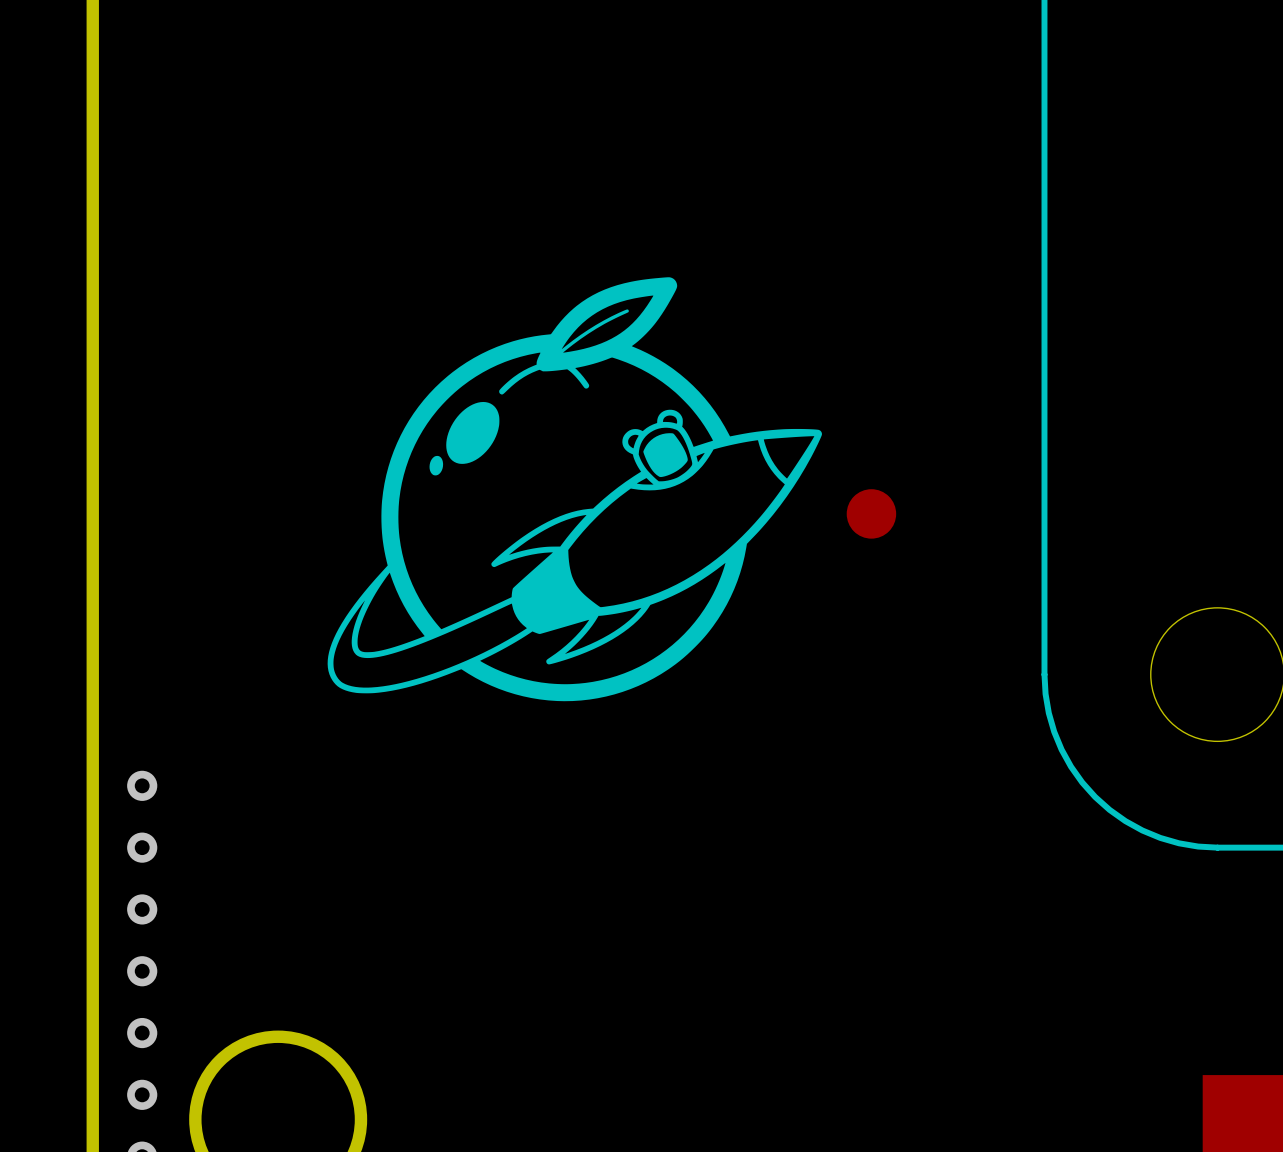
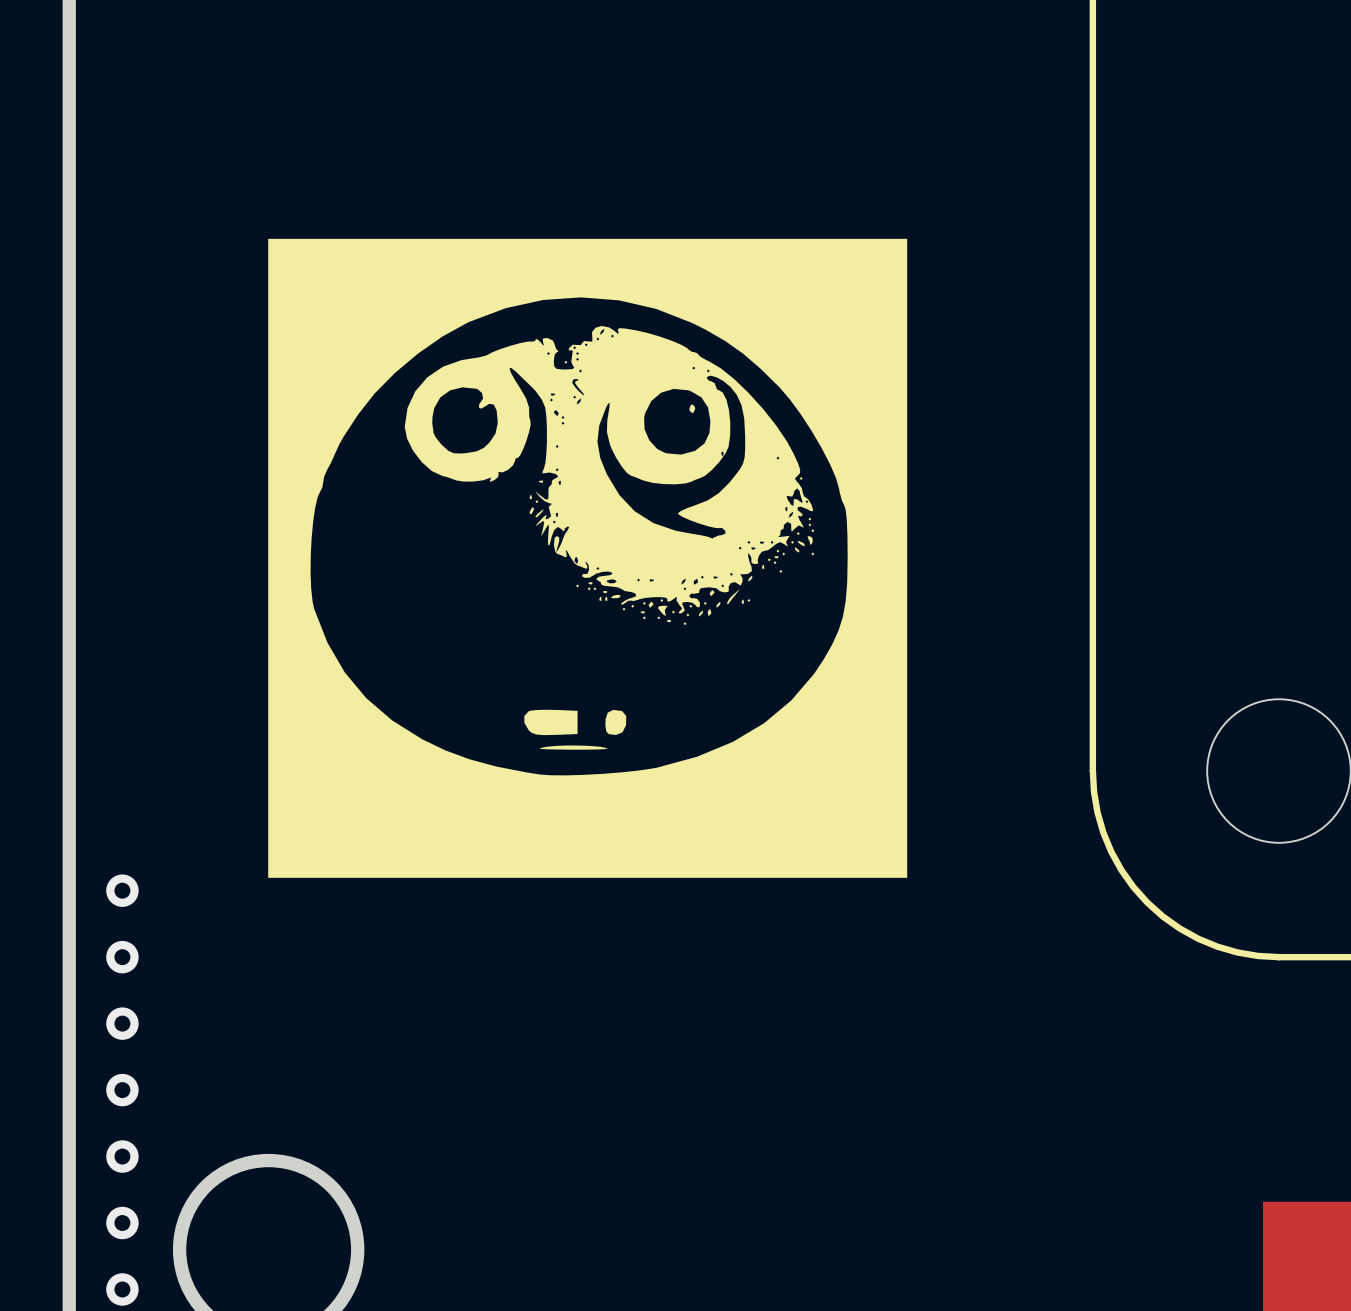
drawing shape: [327, 277, 822, 702] -> [268, 238, 908, 878]
part: (871, 513) -> none

